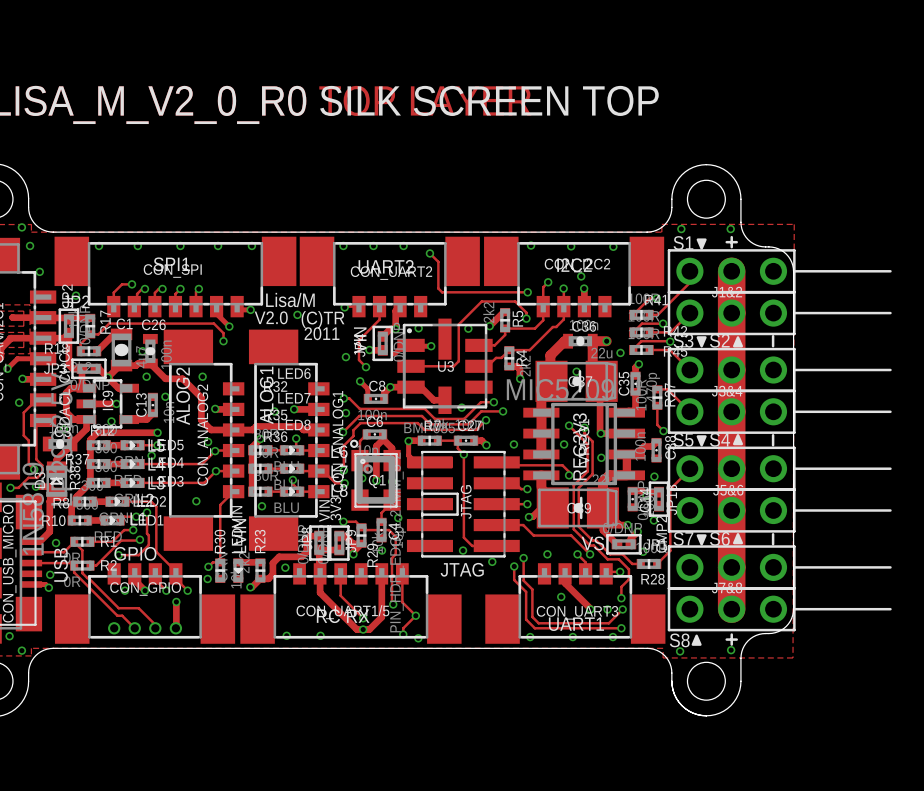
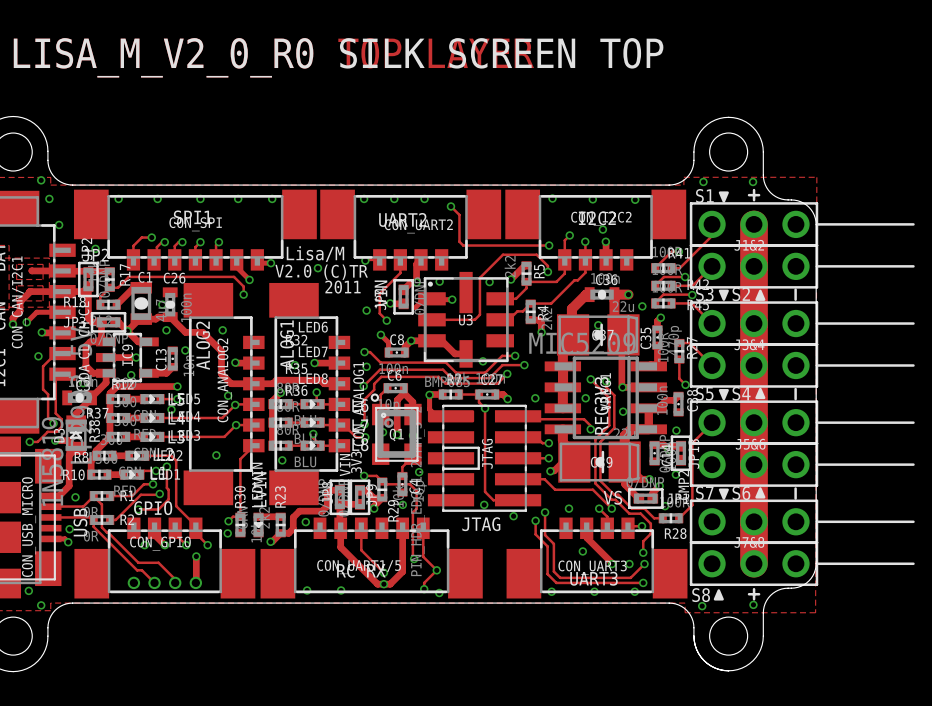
text: UART1 (576, 624) -> UART3 (594, 578)

